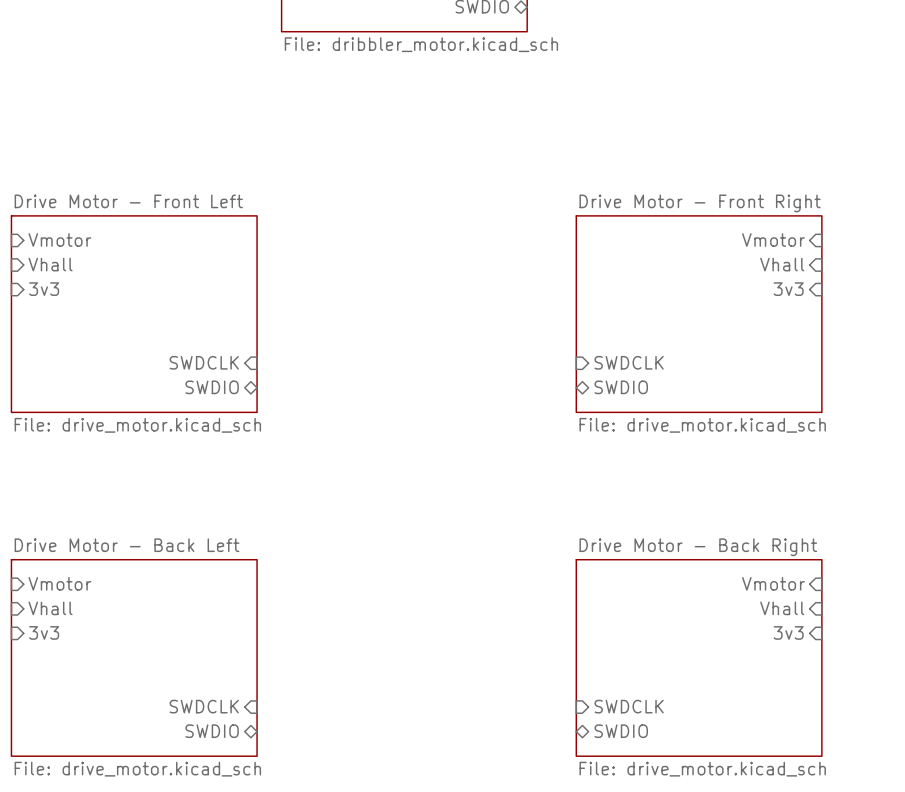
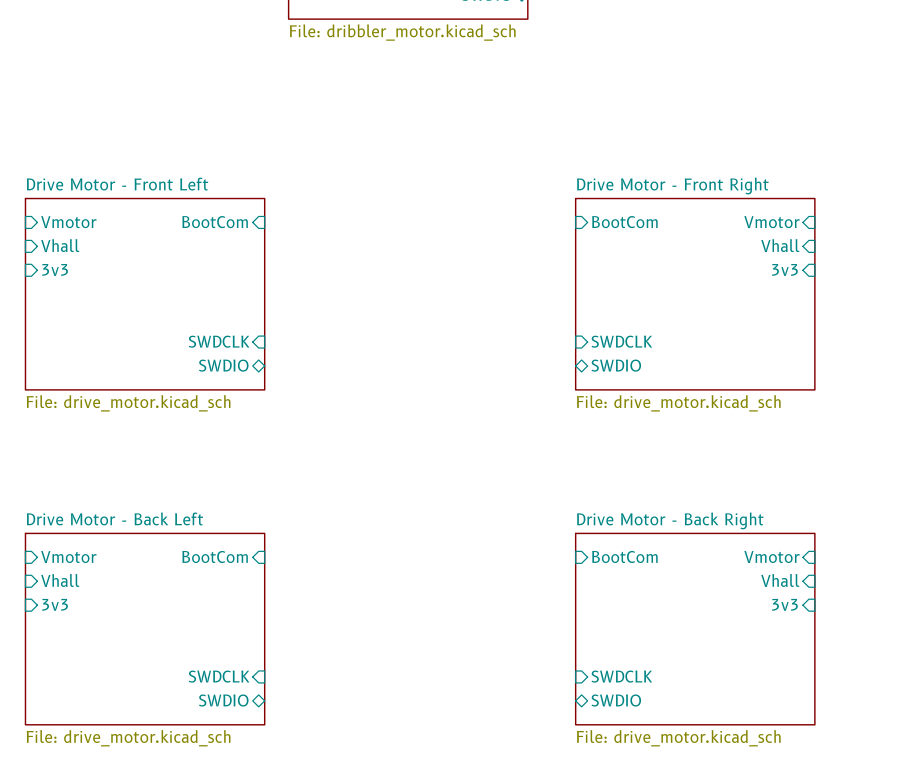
sheet pin: none -> BootCom (215, 222)
sheet pin: none -> BootCom (624, 222)
sheet pin: none -> BootCom (215, 556)
sheet pin: none -> BootCom (624, 556)

